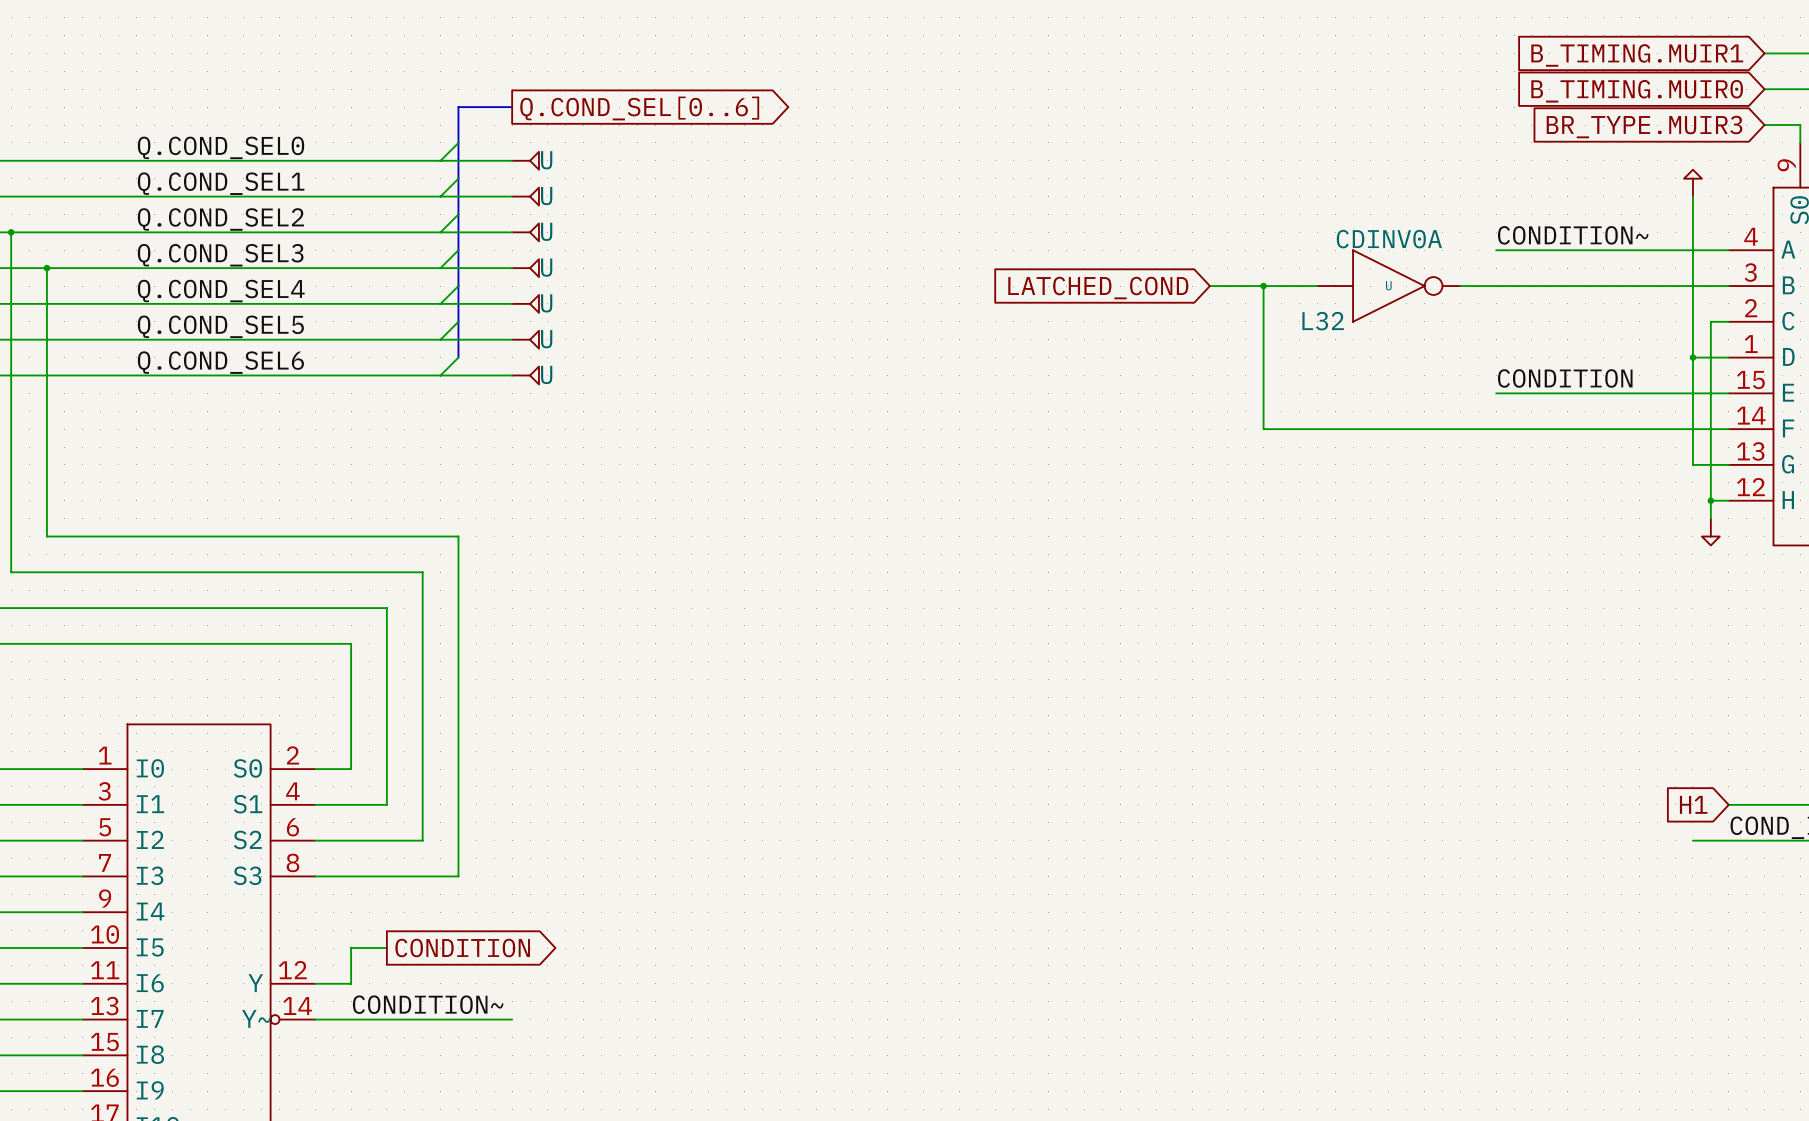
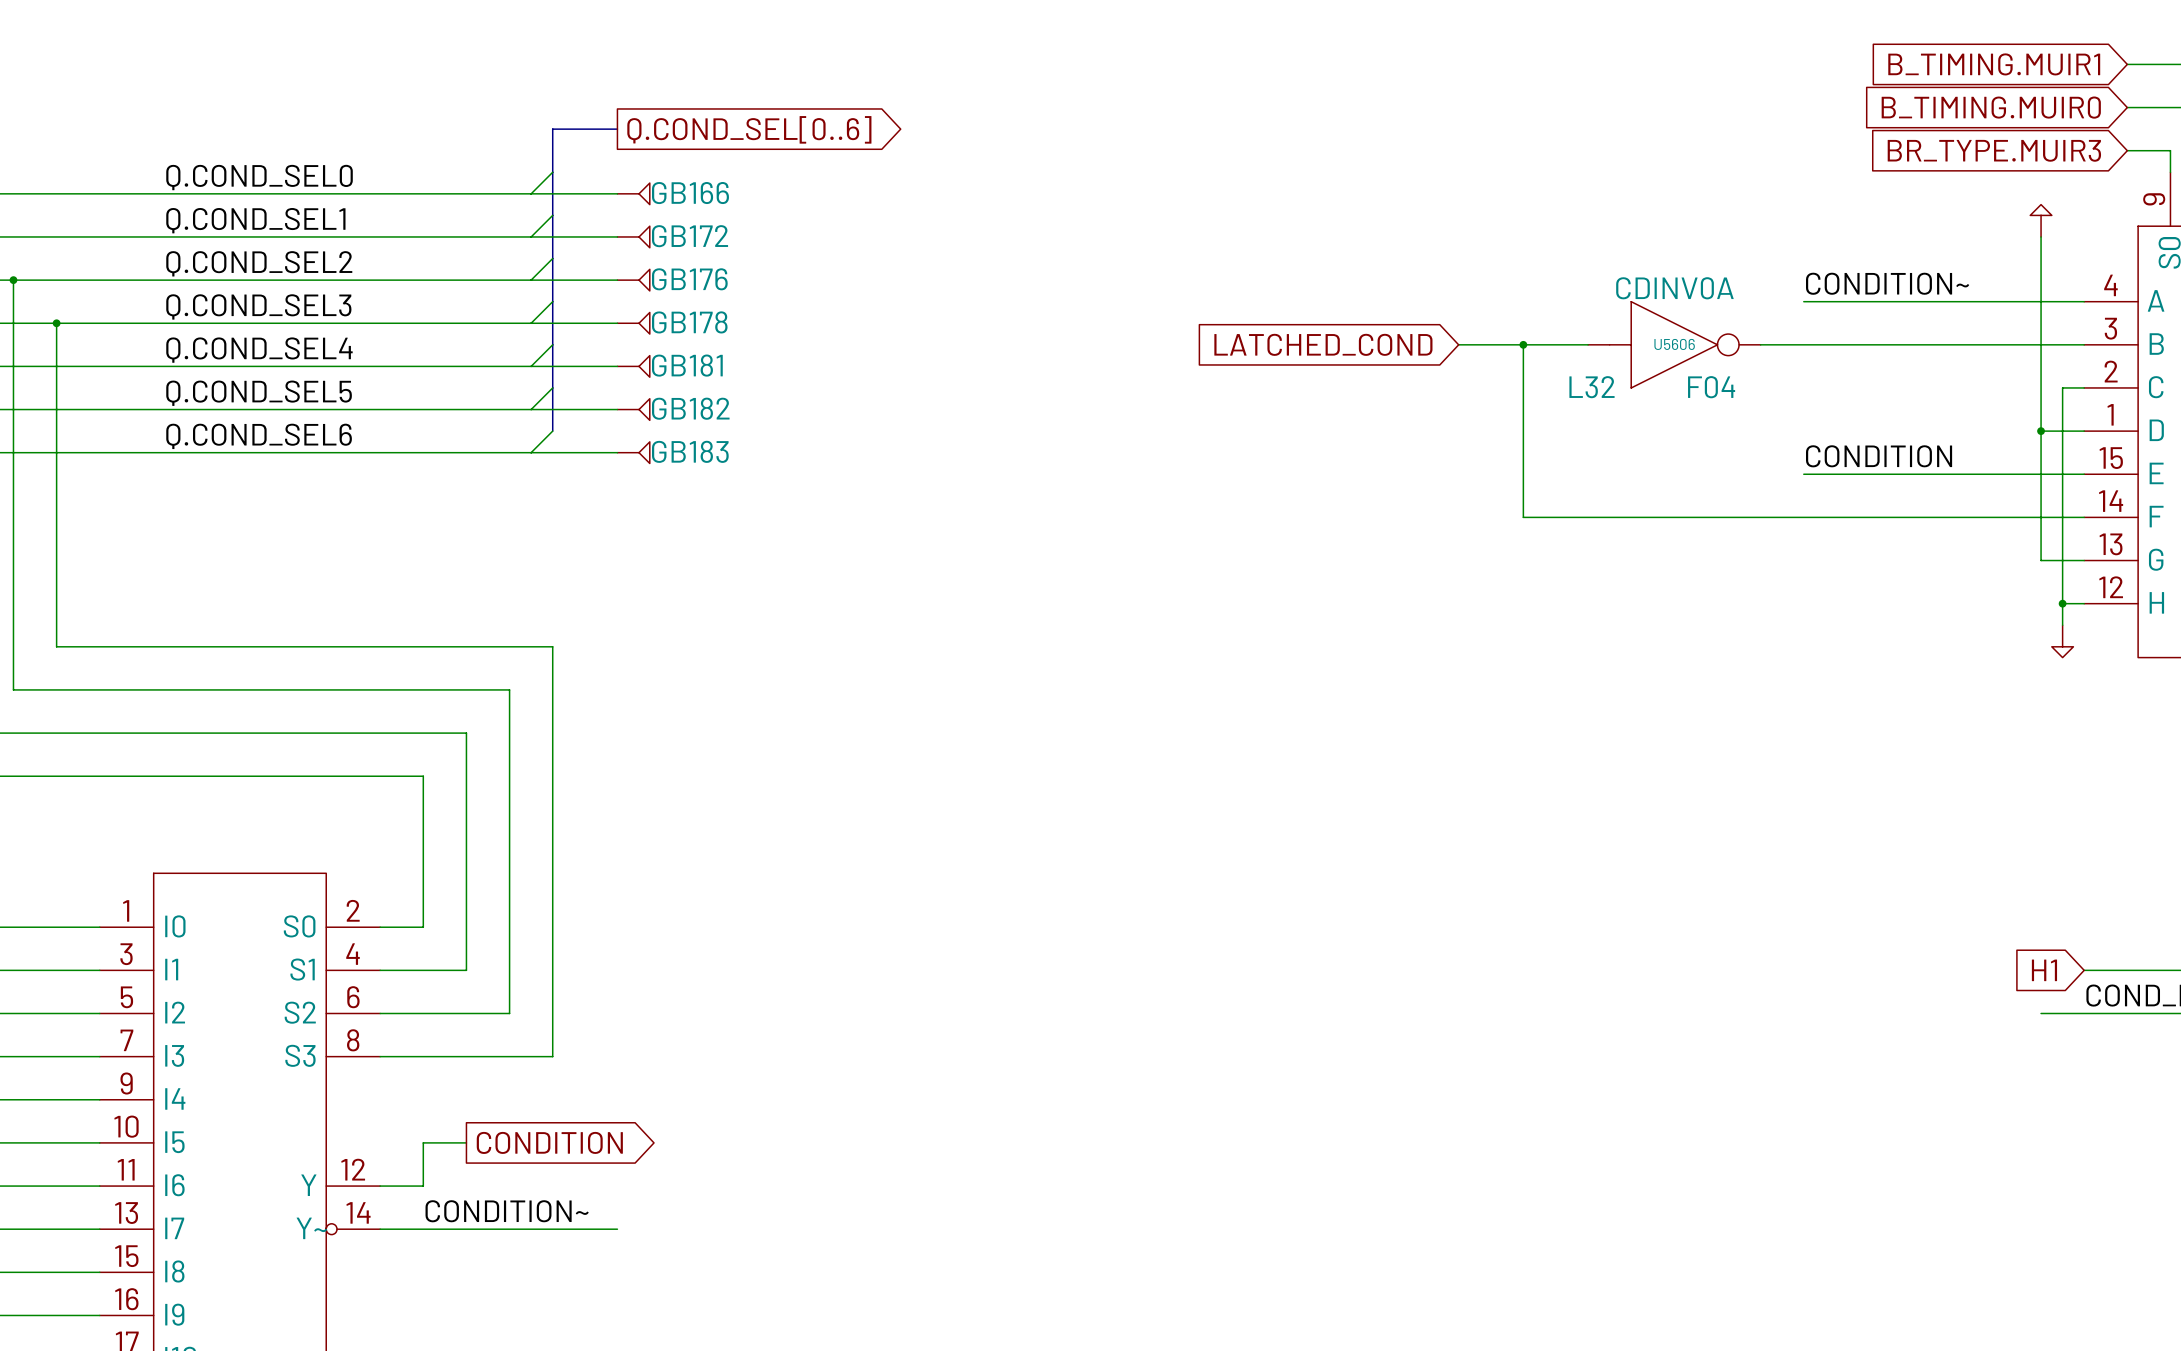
U name: U (546, 160) -> GB166 (690, 193)
U name: U (546, 196) -> GB172 (690, 236)
U name: U (546, 231) -> GB176 (689, 279)
U name: U (546, 267) -> GB178 (689, 322)
U name: U (1388, 285) -> U5606 (1674, 344)
U name: U (546, 303) -> GB181 (687, 365)
U value: none -> F04 (1711, 387)
U name: U (546, 339) -> GB182 (690, 408)
U name: U (546, 374) -> GB183 (690, 451)

